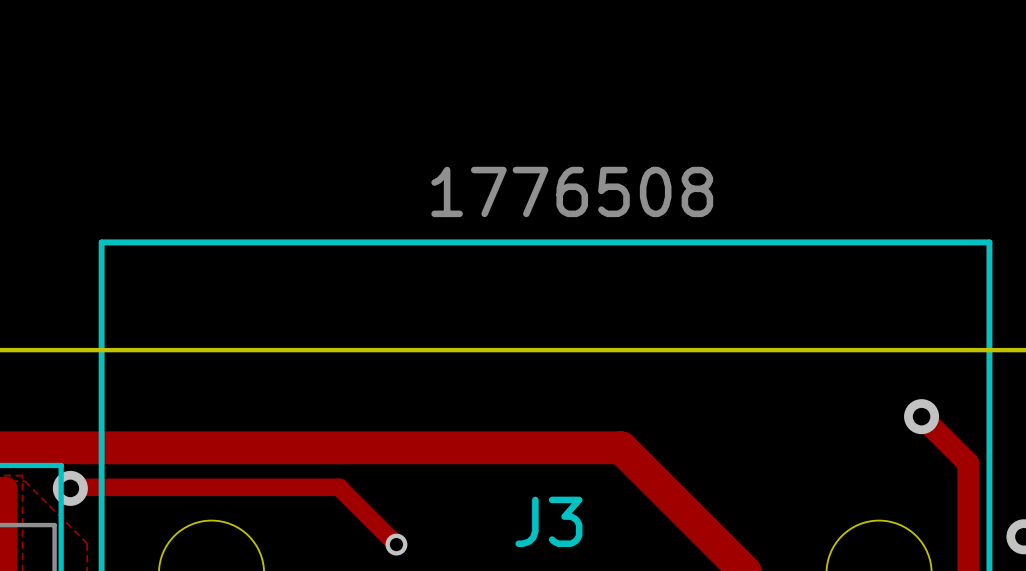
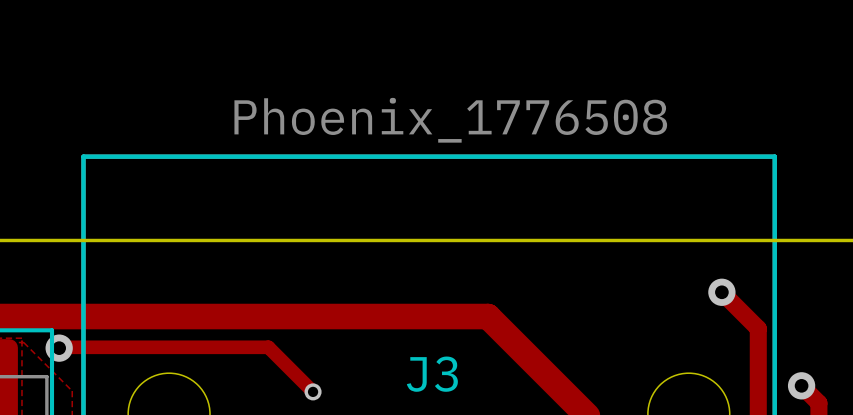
J3 value: 1776508 (572, 191) -> Phoenix_1776508 (450, 120)

